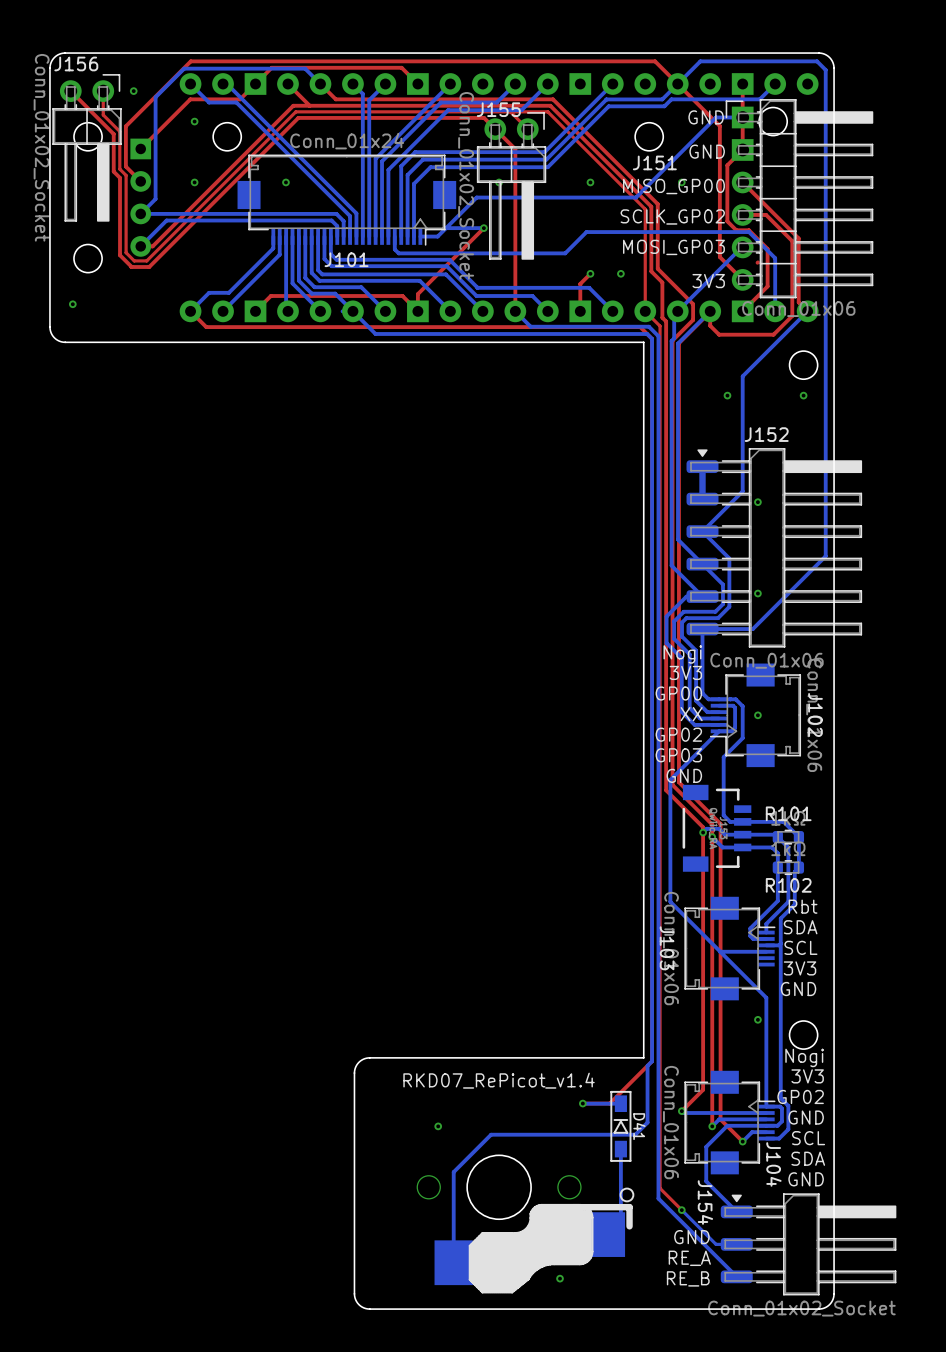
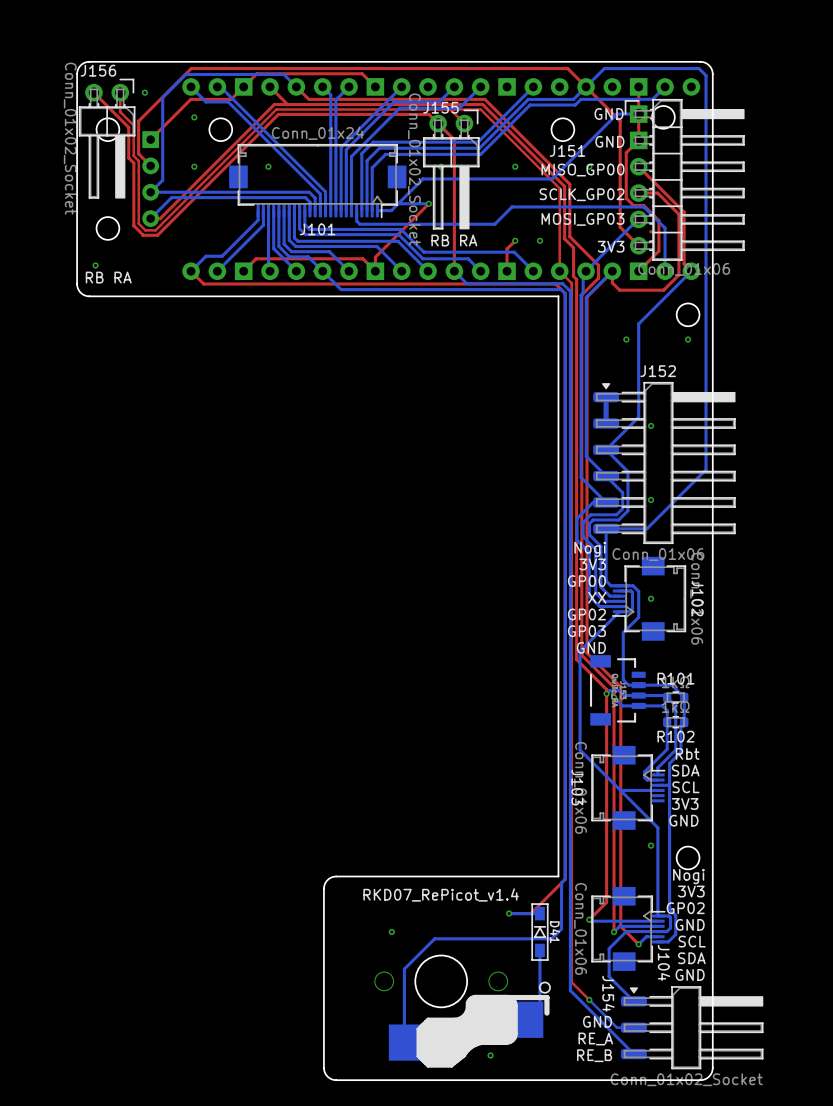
text: none -> RB RA (454, 240)
text: none -> RB RA (108, 277)

